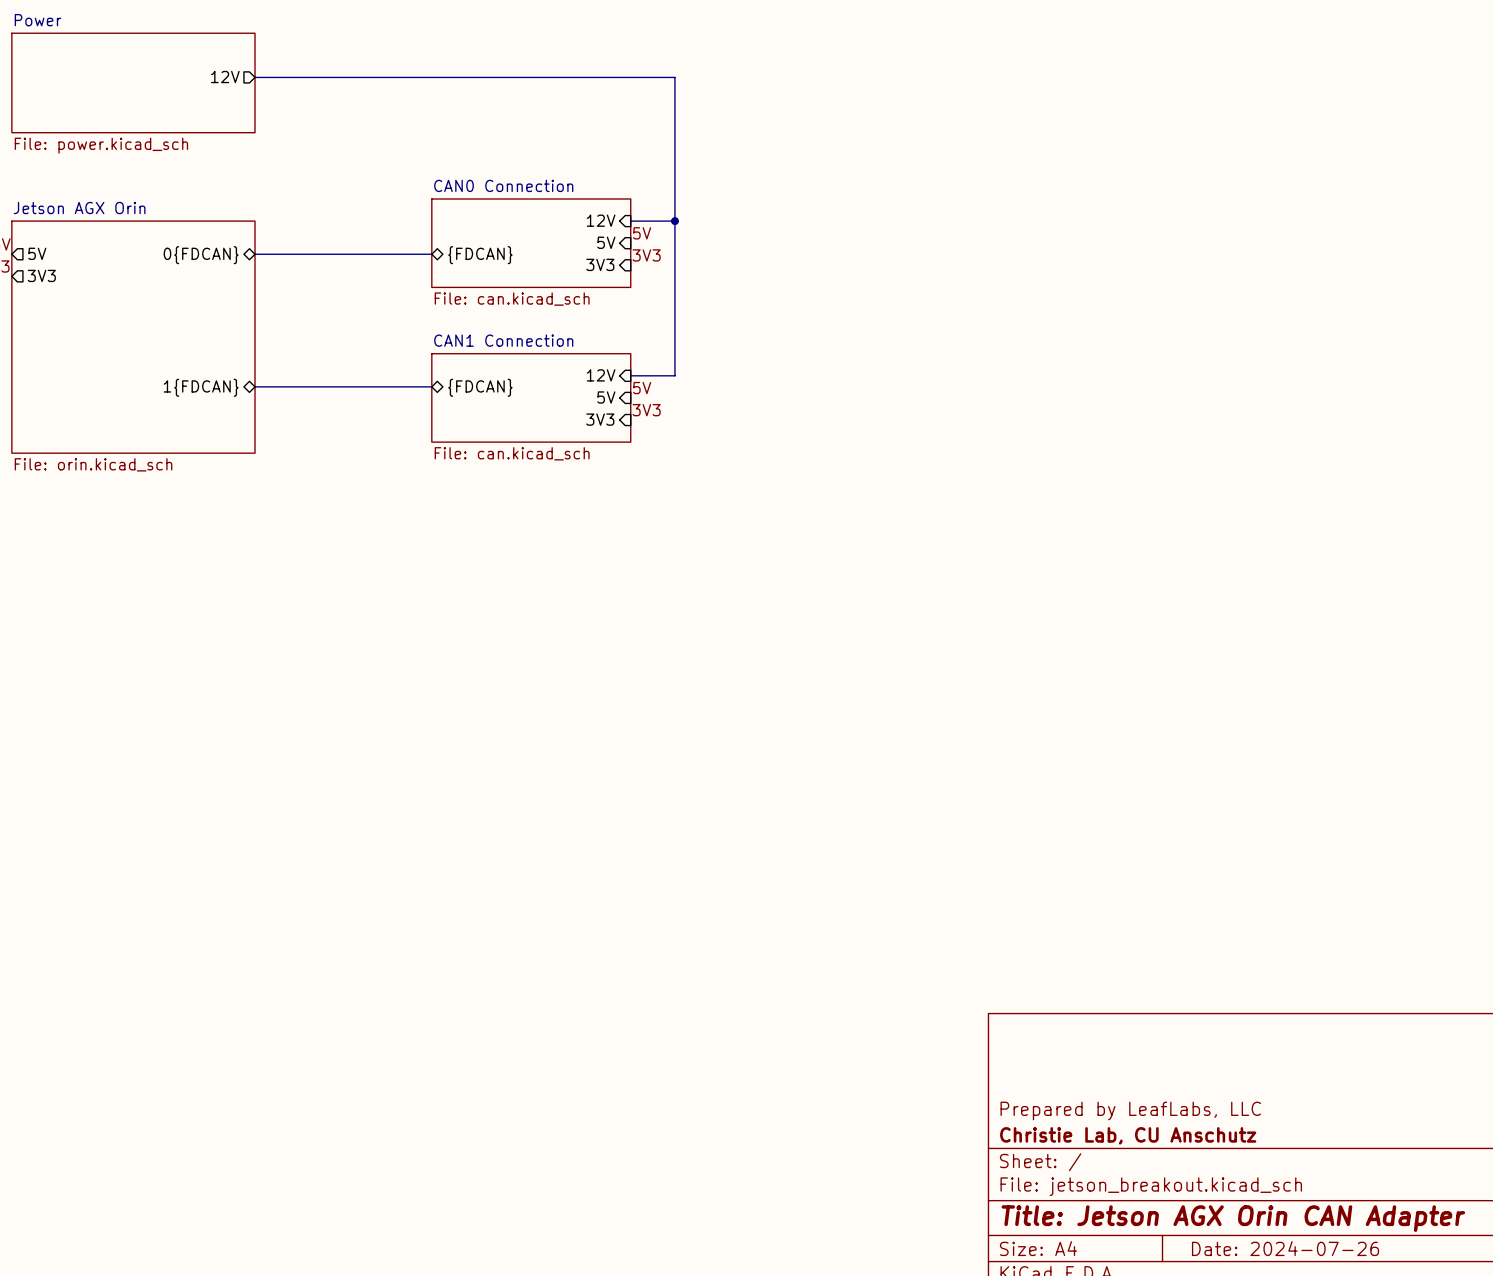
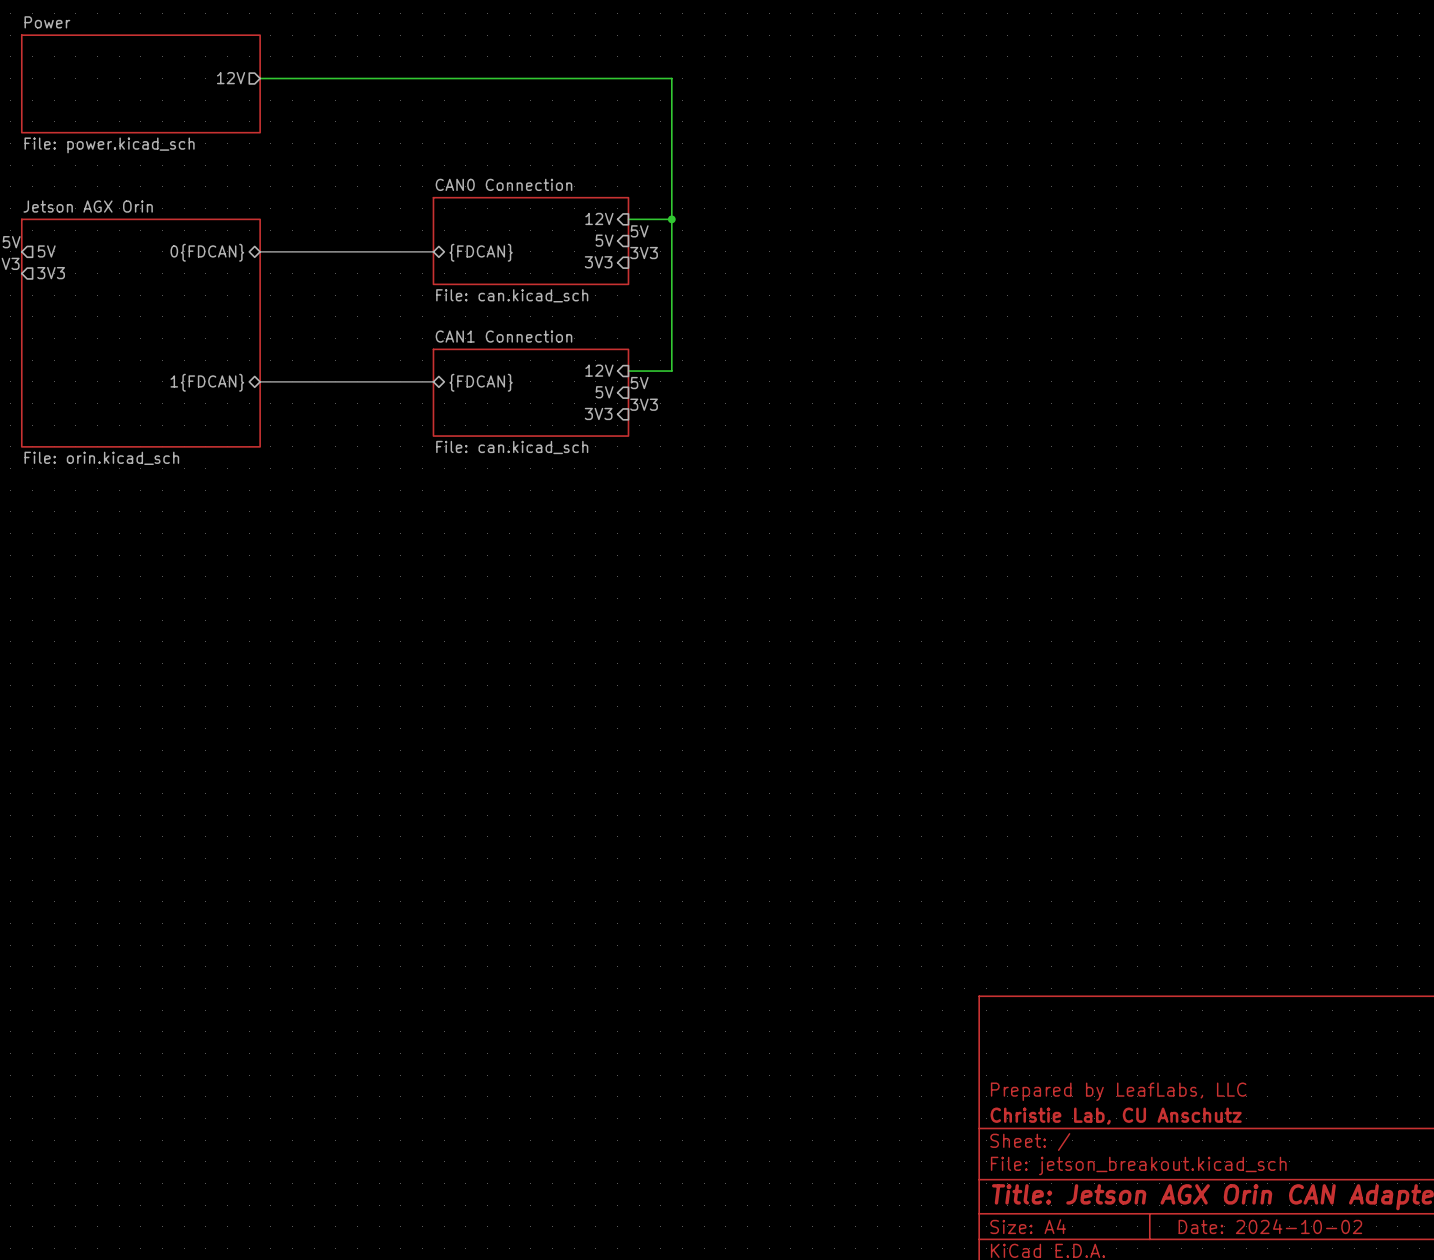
title block: Date: 2024-07-26 (1285, 1248) -> Date: 2024-10-02 (1270, 1226)

